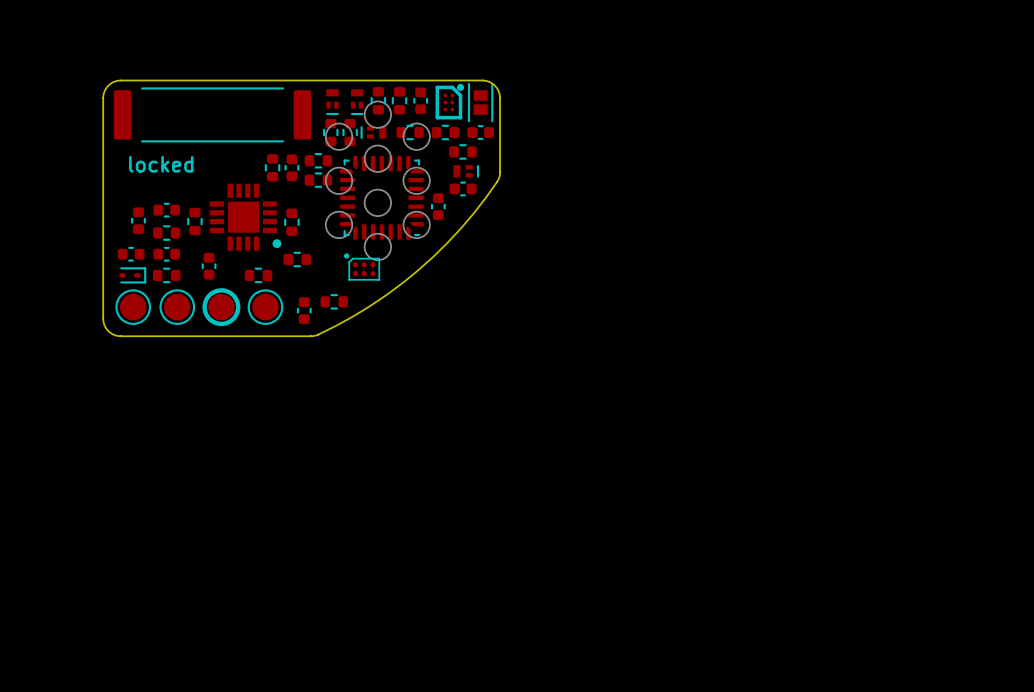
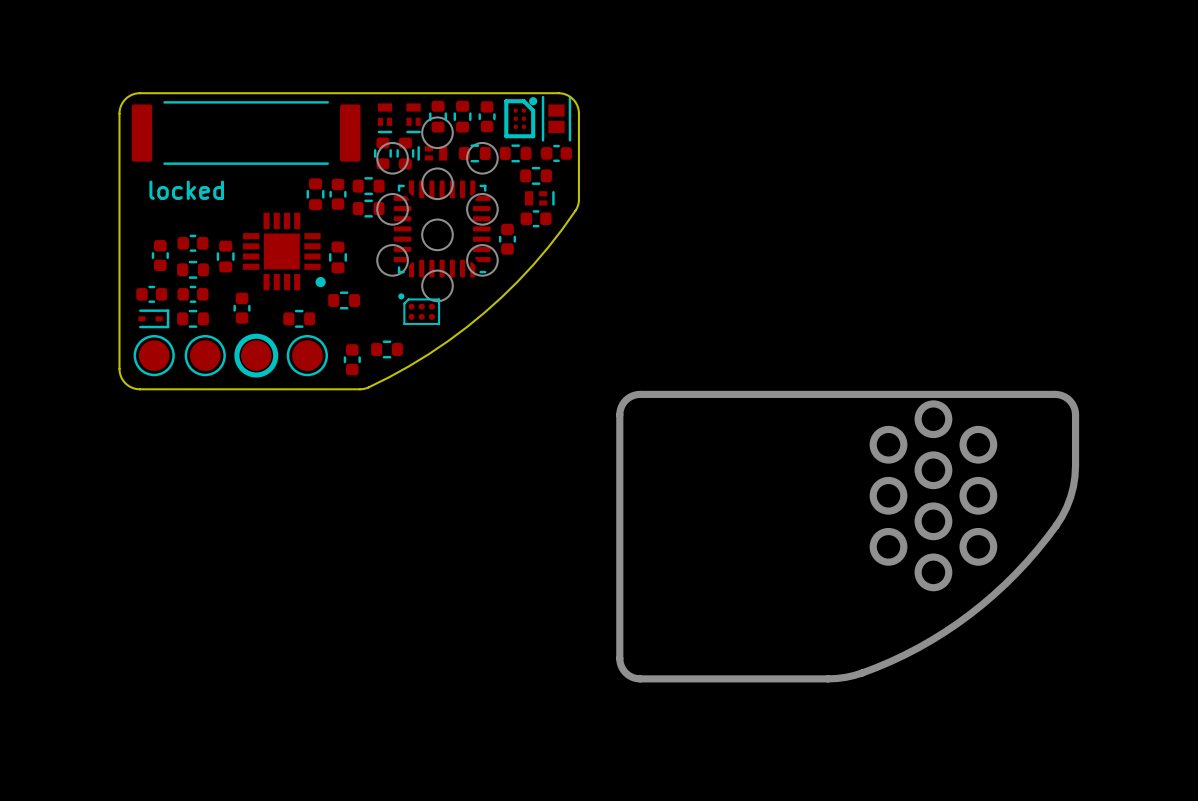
line: none -> (640, 394) (1060, 395) (1071, 402) (1075, 412) (1075, 465) (1073, 487) (1066, 507) (1056, 525) (1036, 550) (1004, 584) (981, 605) (944, 632) (890, 661) (862, 672) (836, 678) (635, 678) (625, 672) (619, 660) (619, 414) (621, 407) (625, 400) (632, 395) (640, 394)
drawing: none -> [869, 400, 998, 592]

